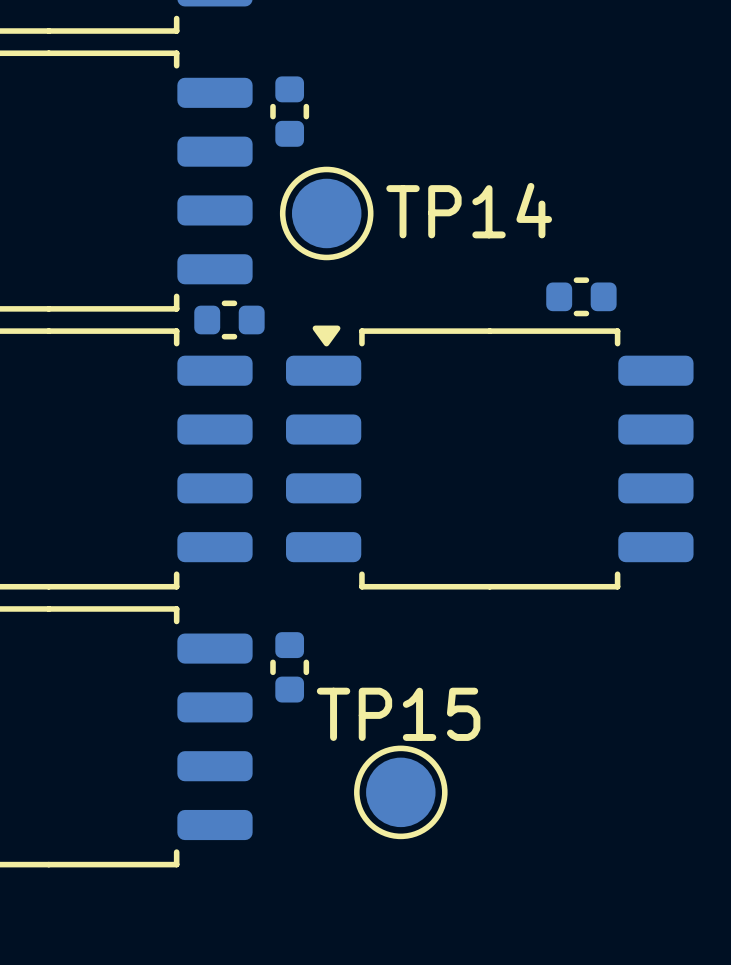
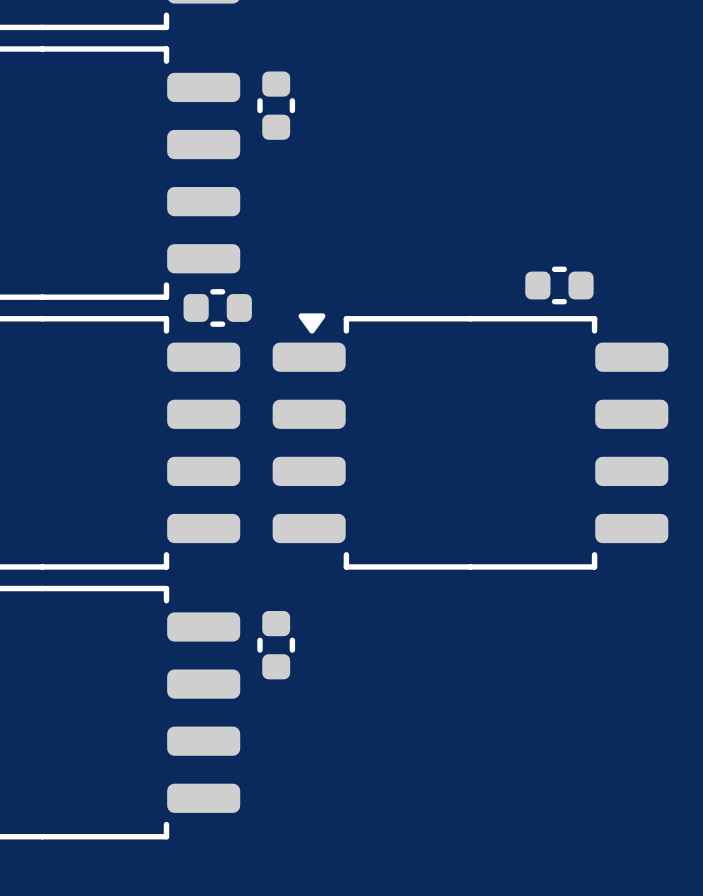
TP14: (326, 213) -> none
TP15: (400, 792) -> none

